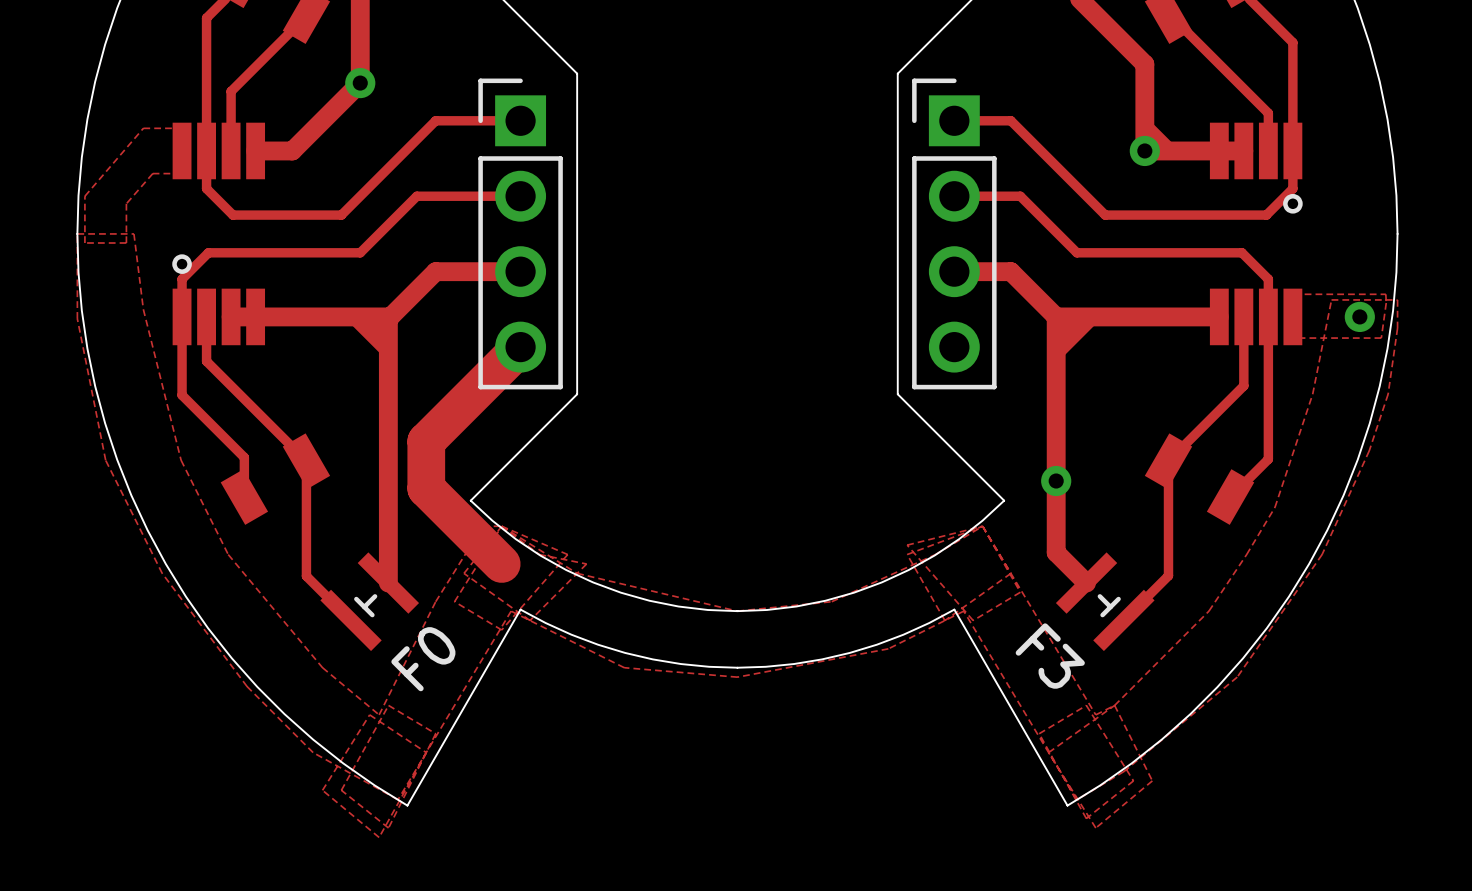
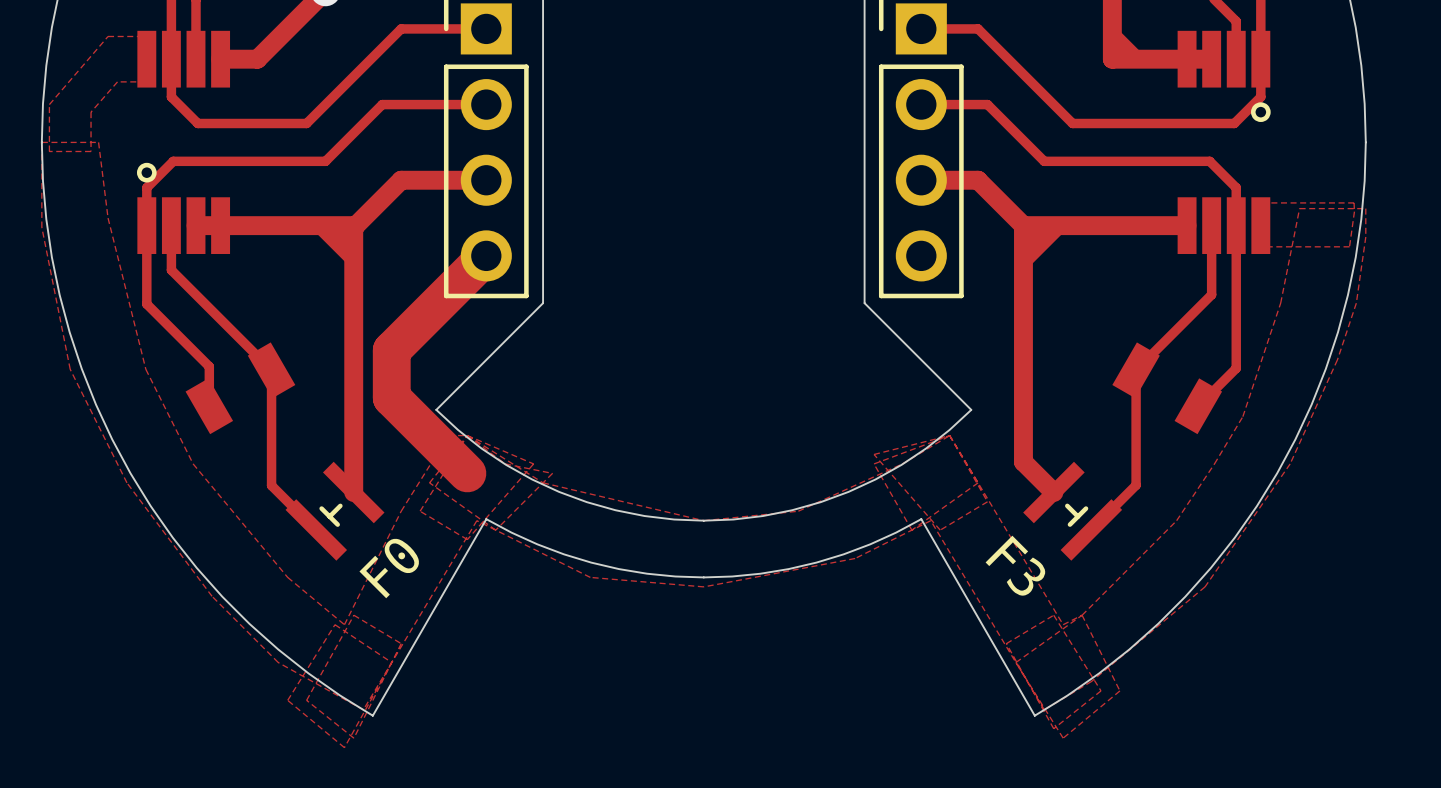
via: (1144, 150) -> none
via: (1359, 316) -> none
via: (1056, 481) -> none

